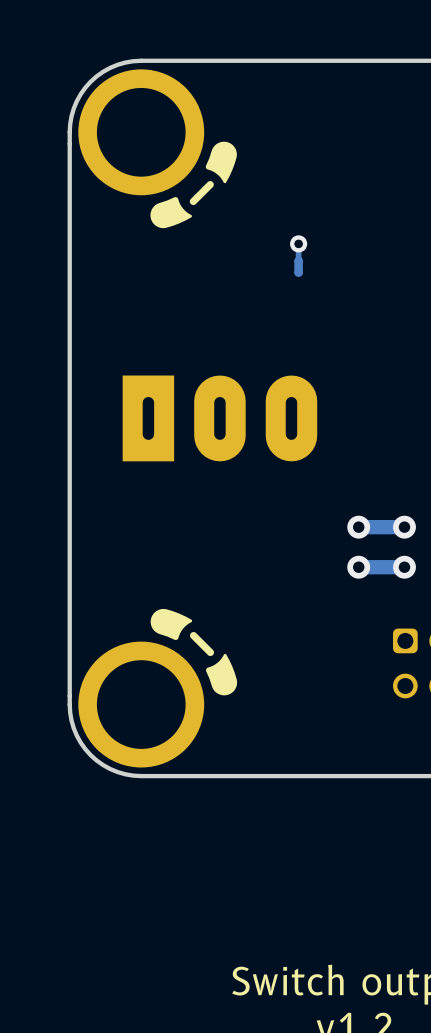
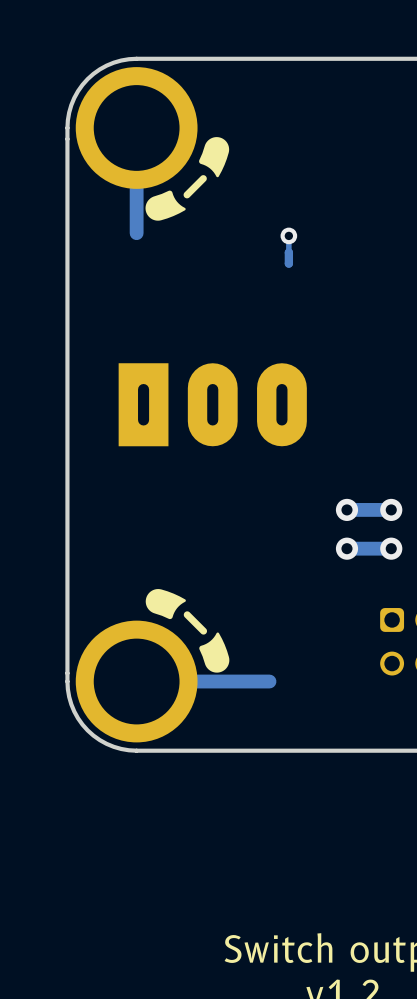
track: none -> (136, 127) (136, 233)
track: none -> (269, 681) (136, 681)

